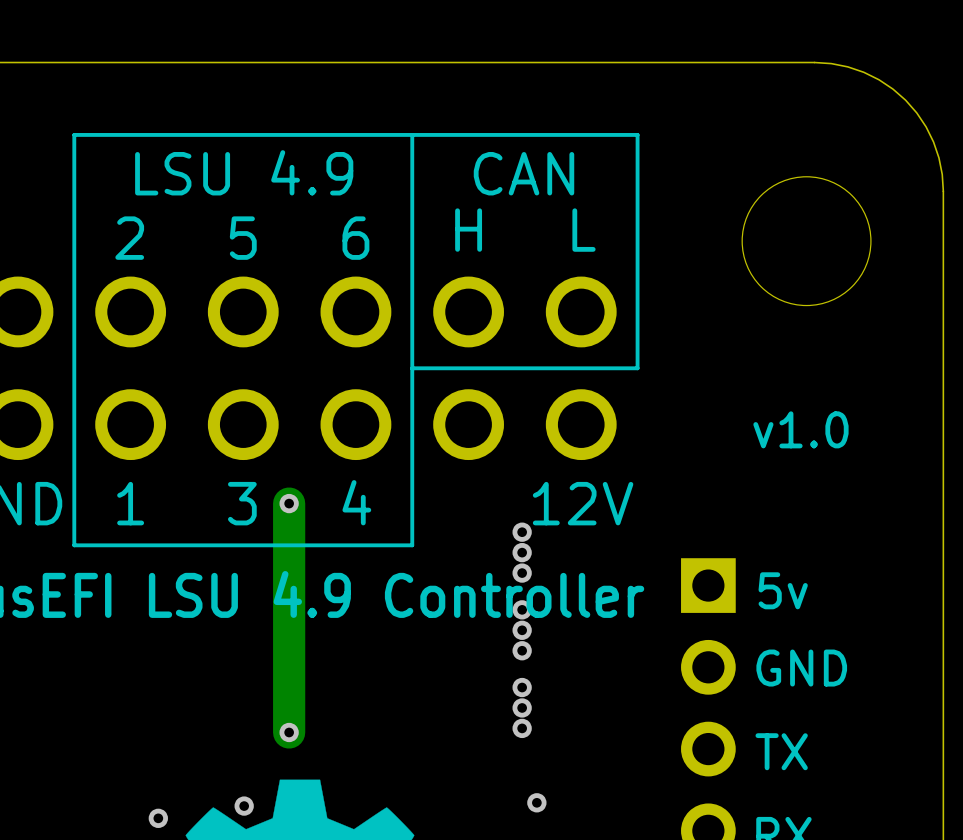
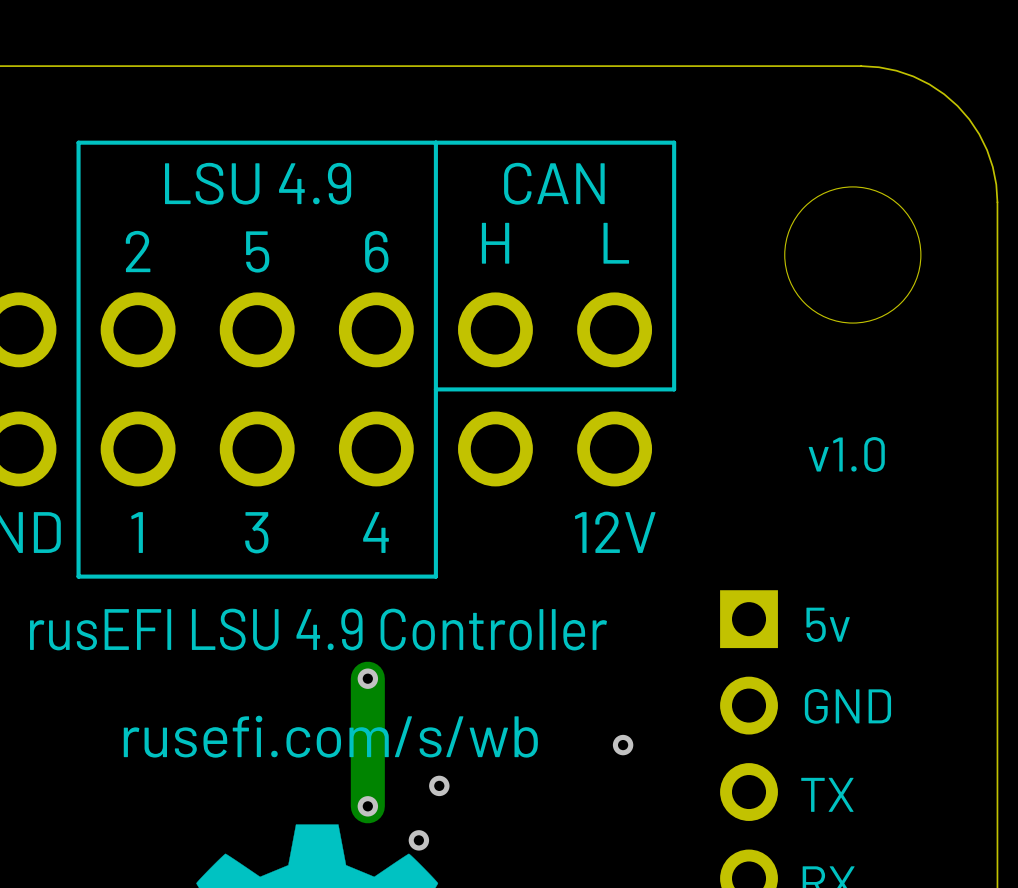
track: (289, 503) (289, 732) -> none
via: (289, 503) -> none
via: (522, 532) -> none
via: (522, 552) -> none
via: (522, 573) -> none
via: (522, 609) -> none
via: (522, 630) -> none
track: none -> (367, 678) (367, 806)
via: none -> (367, 678)
via: (522, 650) -> none
via: (522, 687) -> none
text: none -> rusefi.com/s/wb (330, 736)
via: none -> (623, 745)
via: (522, 707) -> none
via: (522, 728) -> none
via: (289, 732) -> none
via: none -> (439, 785)
via: none -> (367, 806)
via: none -> (418, 840)
via: (536, 802) -> none
via: (244, 806) -> none
via: (158, 818) -> none

